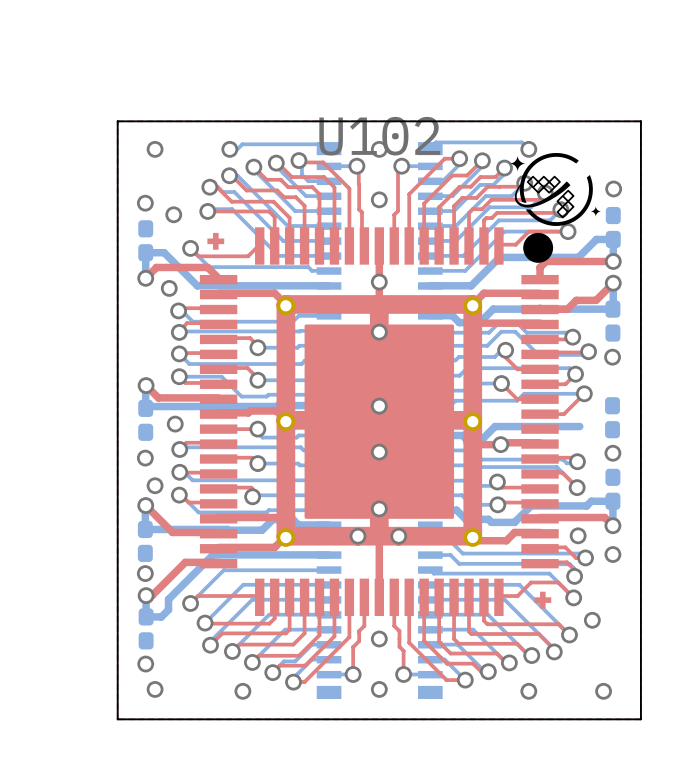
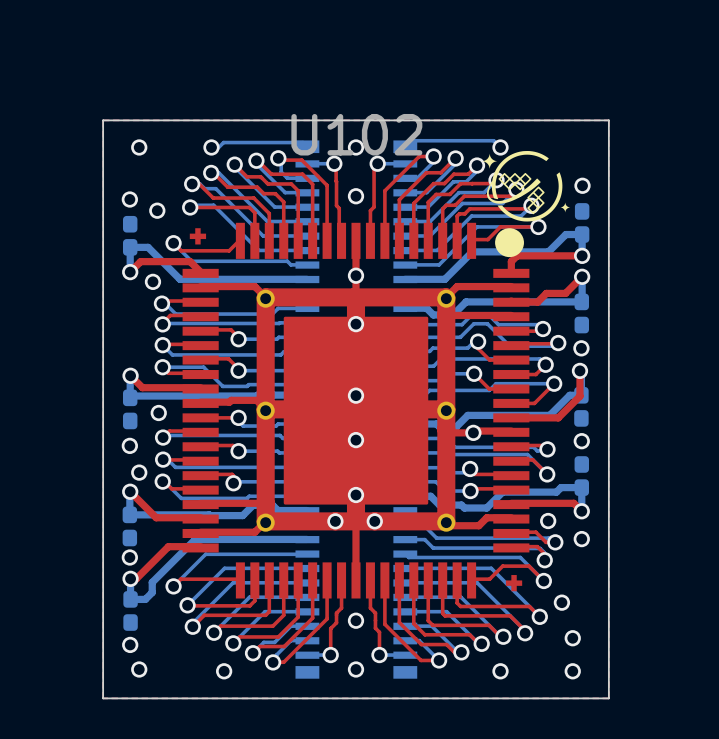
top track: none -> (579, 370) (579, 396) (558, 417) (511, 417)
bottom track: none -> (579, 370) (581, 395) (569, 395) (549, 415)
via: none -> (579, 370)
via: none -> (572, 638)

